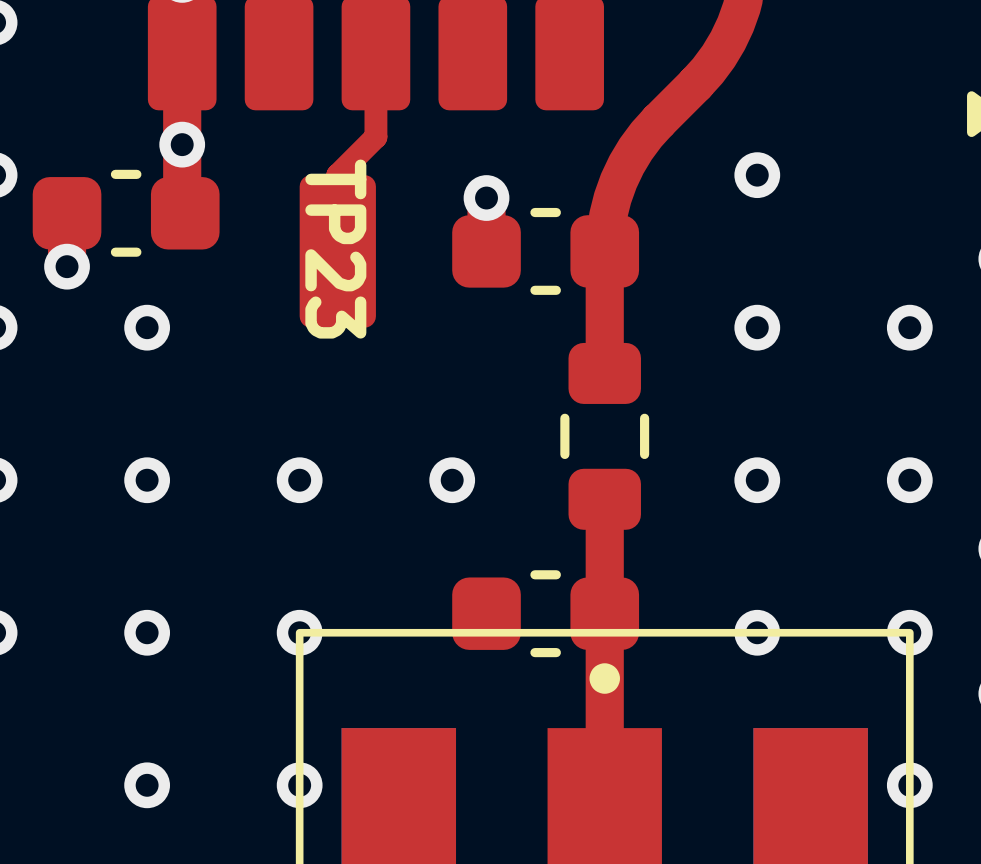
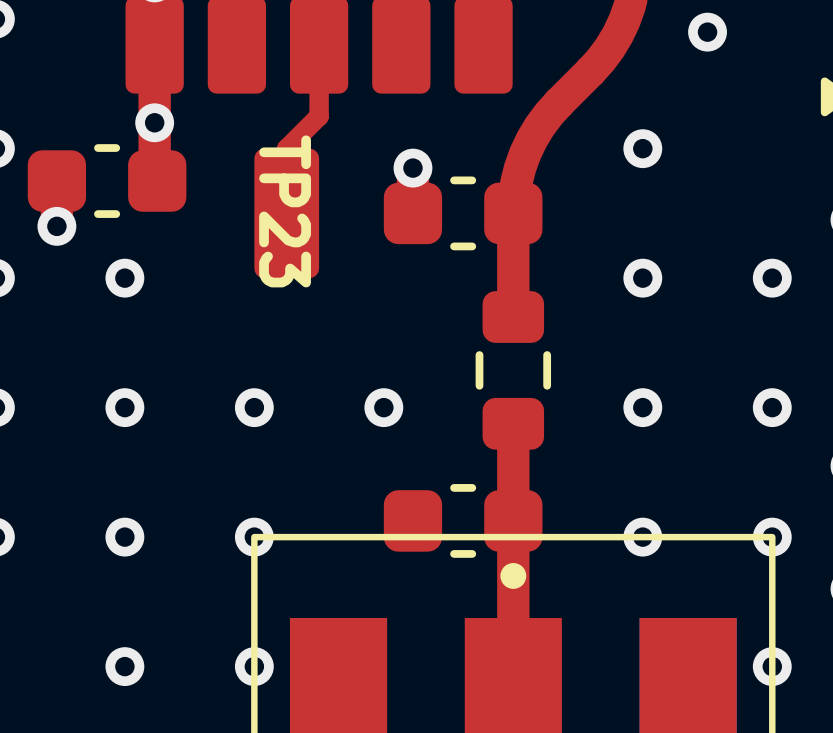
via: none -> (707, 32)

